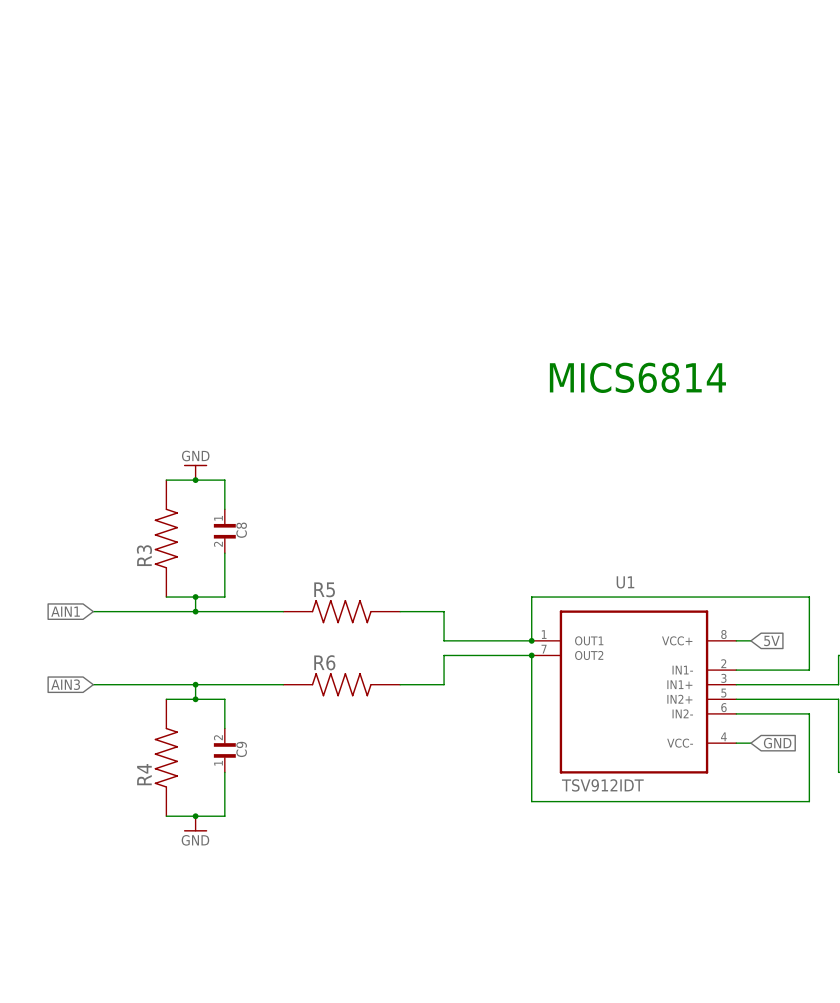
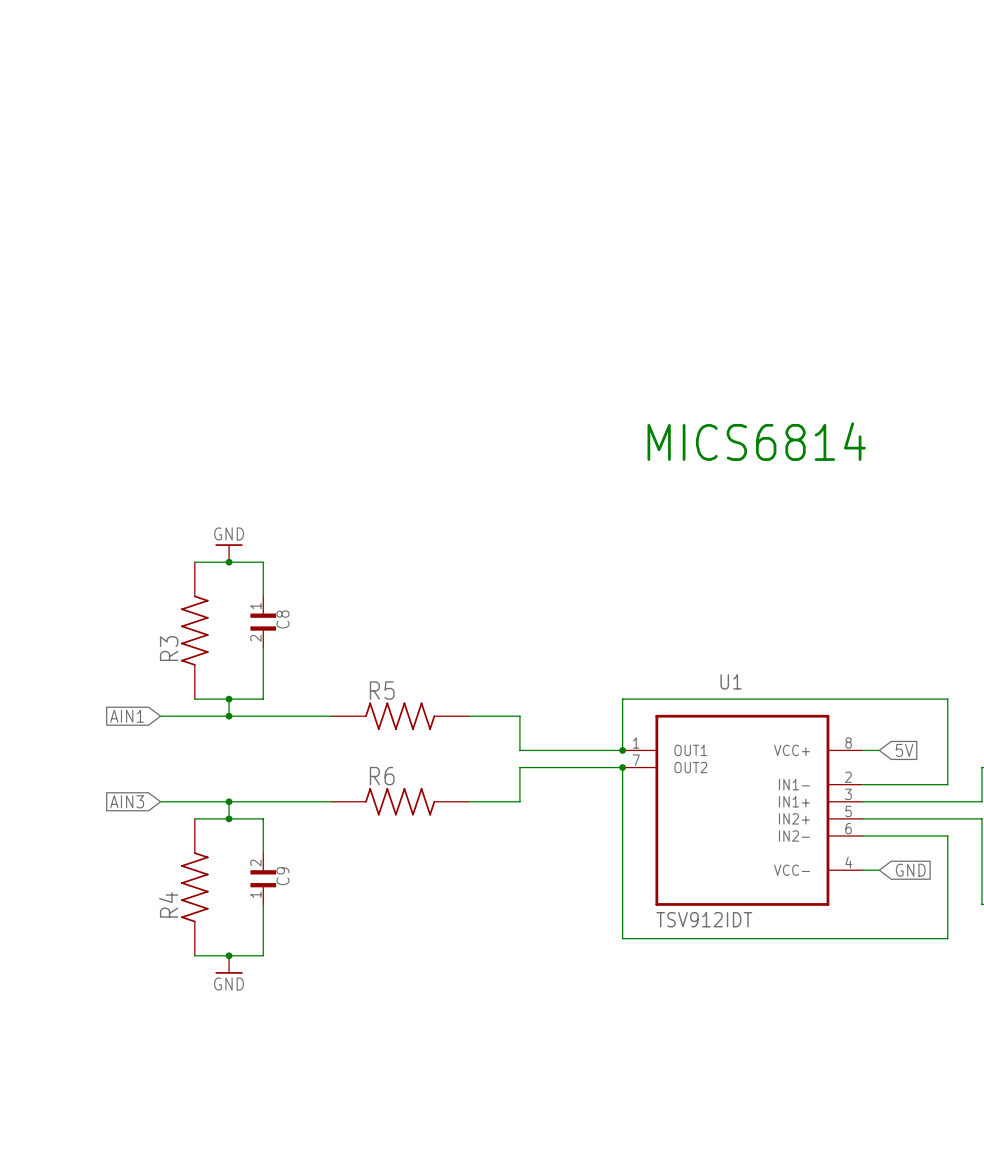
global label position: AIN1 (65, 611) -> AIN1 (127, 716)
wire: (93, 611) (137, 611) -> none
global label position: AIN3 (65, 684) -> AIN3 (127, 801)
wire: (93, 684) (137, 684) -> none

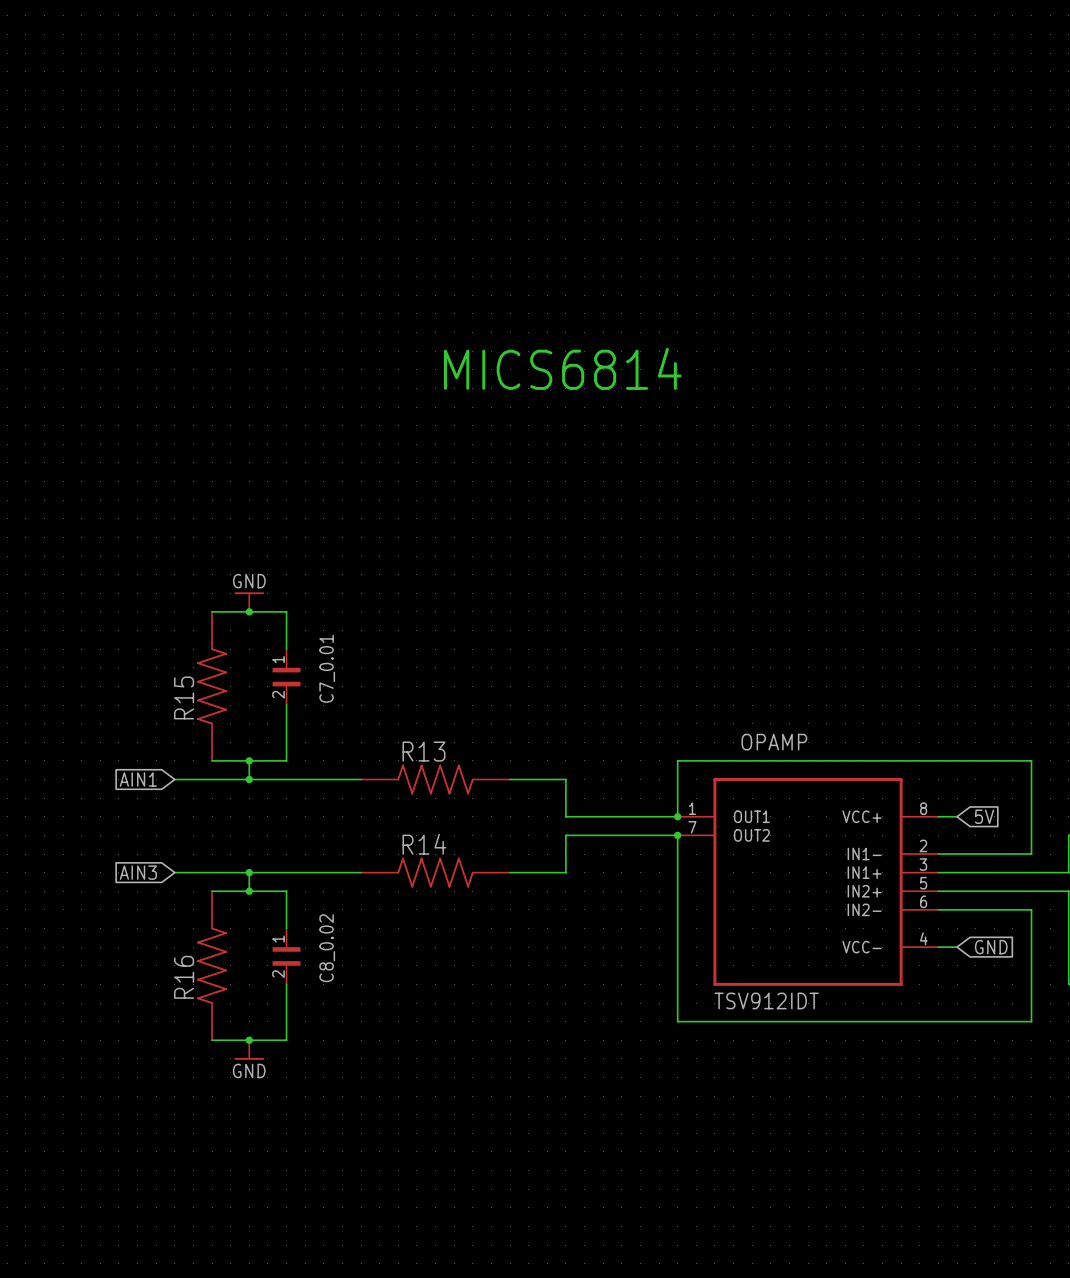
text: none -> MICS6814 (562, 368)
text: MICS6814 (756, 441) -> none
C8 name: C8 (282, 619) -> C7_0.01 (327, 668)
R3 name: R3 (169, 648) -> R15 (184, 697)
U1 name: U1 (731, 681) -> OPAMP (774, 742)
R5 name: R5 (382, 690) -> R13 (423, 751)
R6 name: R6 (382, 776) -> R14 (424, 844)
C9 name: C9 (282, 876) -> C8_0.02 (327, 948)
C9 rotation: 0° (263, 878) -> 180° (286, 956)
R4 name: R4 (168, 904) -> R16 (184, 977)

